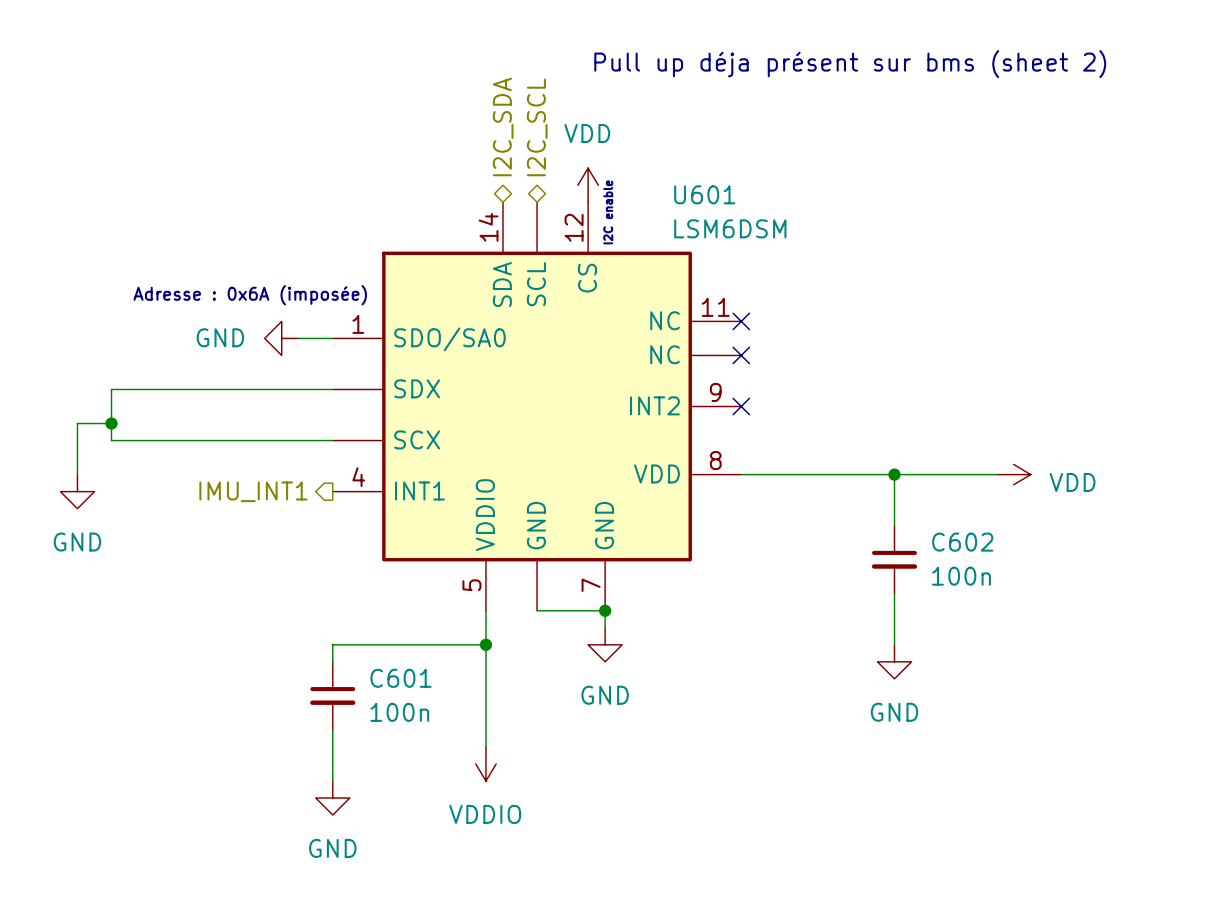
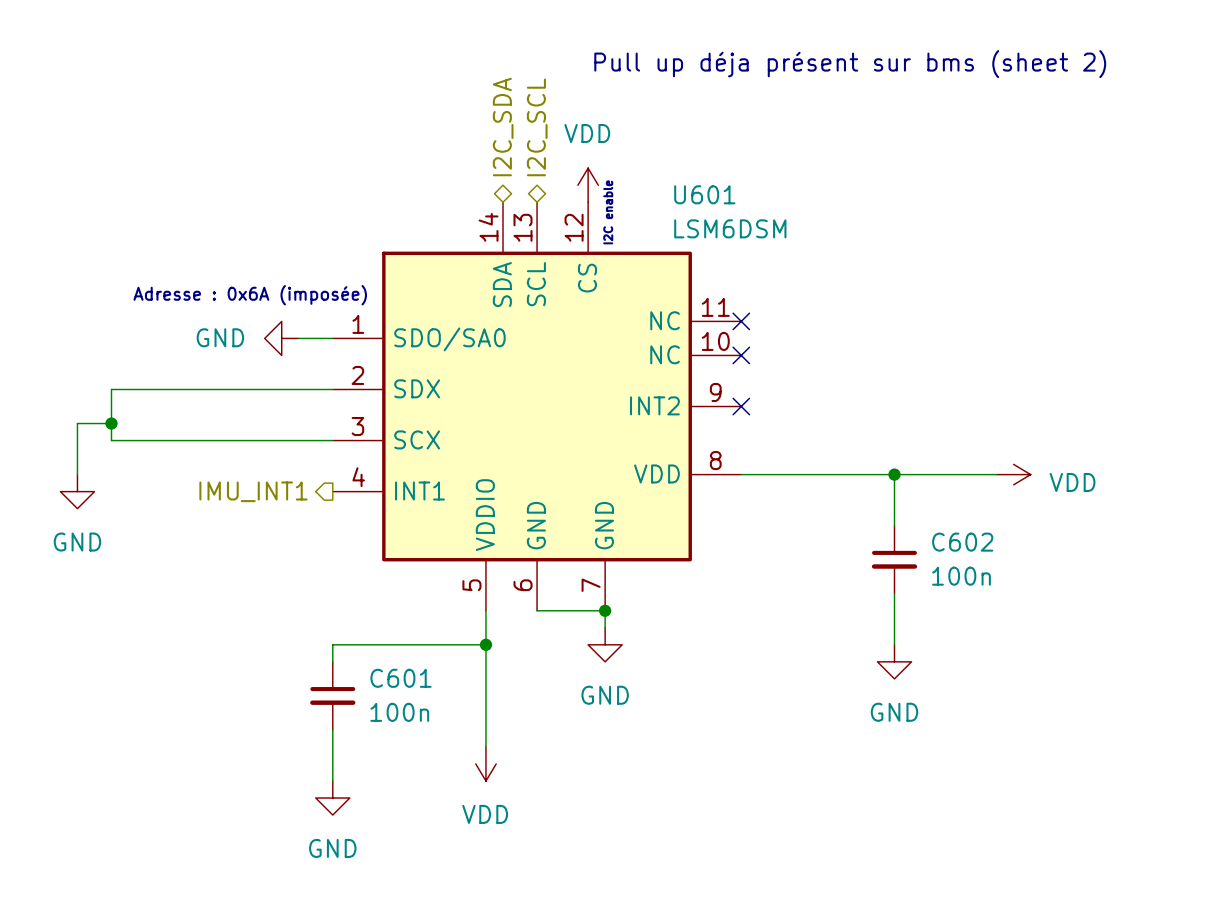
U601 pin number: none -> 13 (523, 227)
U601 pin number: none -> 10 (715, 341)
U601 pin number: none -> 2 (357, 375)
U601 pin number: none -> 3 (357, 426)
U601 pin number: none -> 6 (523, 585)
power symbol: VDDIO (485, 763) -> VDD (485, 763)

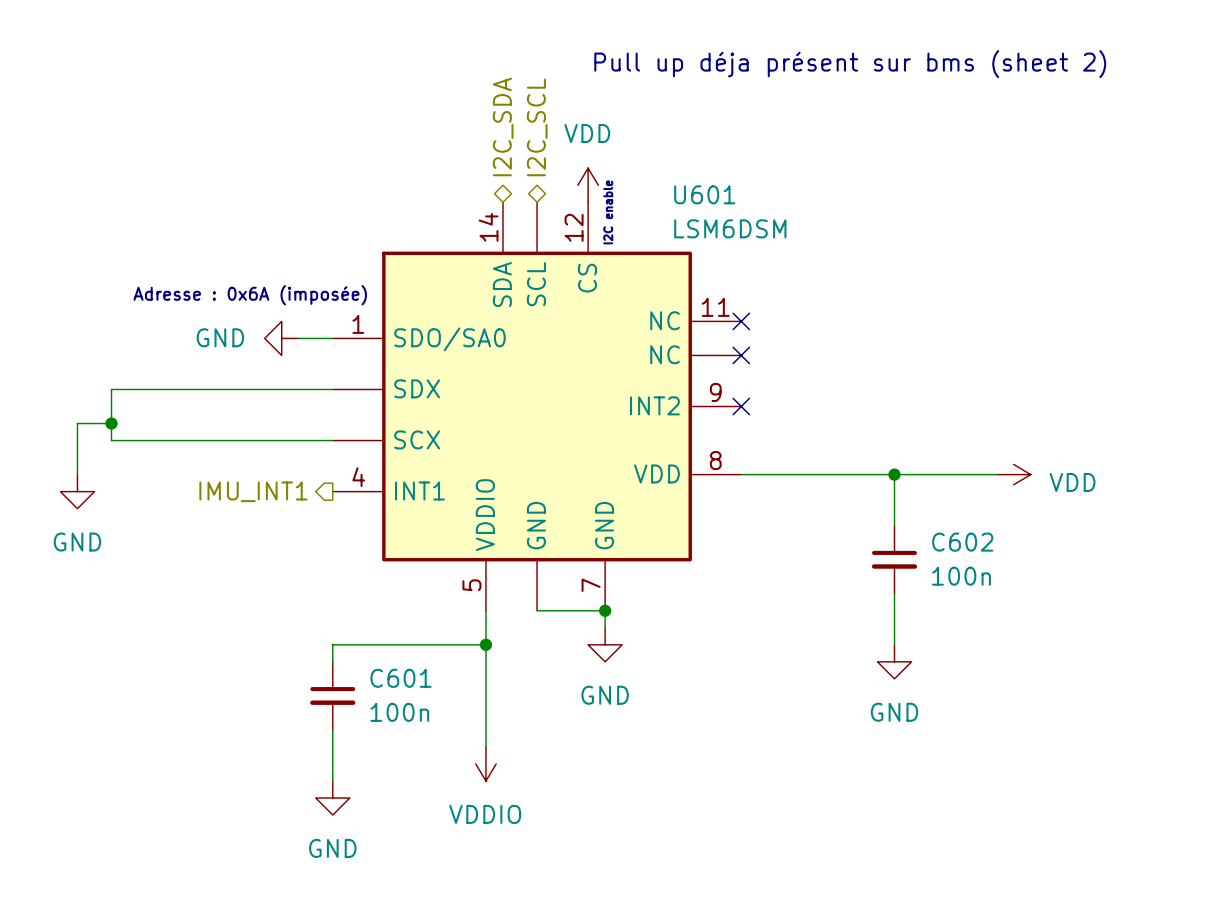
U601 pin number: 13 (523, 227) -> none
U601 pin number: 10 (715, 341) -> none
U601 pin number: 2 (357, 375) -> none
U601 pin number: 3 (357, 426) -> none
U601 pin number: 6 (523, 585) -> none
power symbol: VDD (485, 763) -> VDDIO (485, 763)

